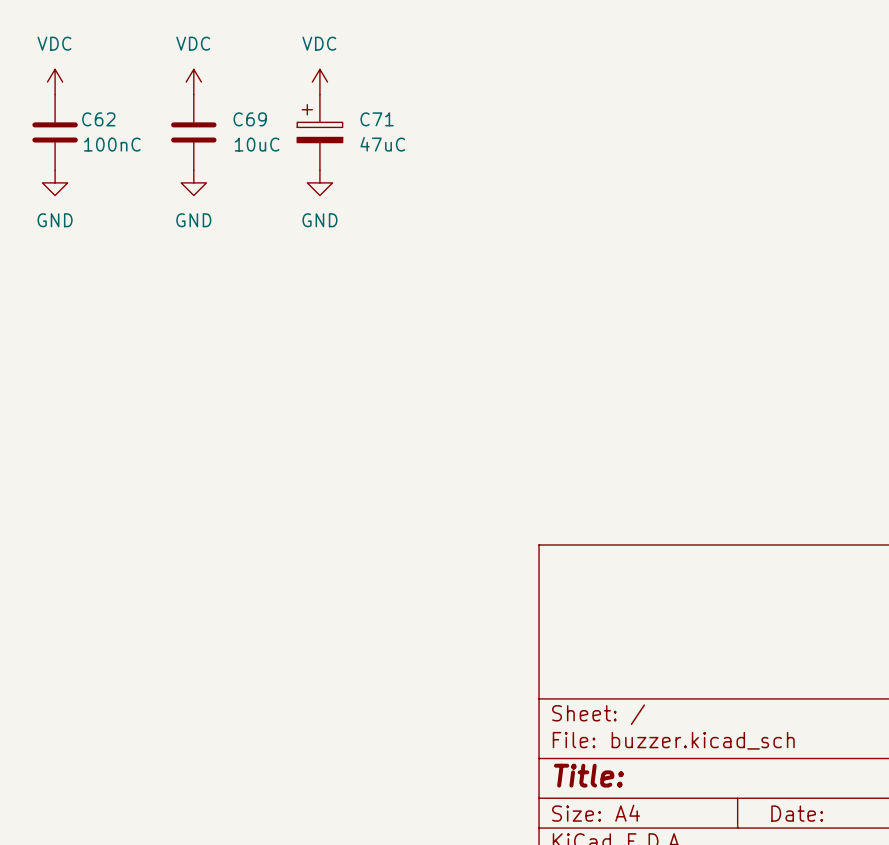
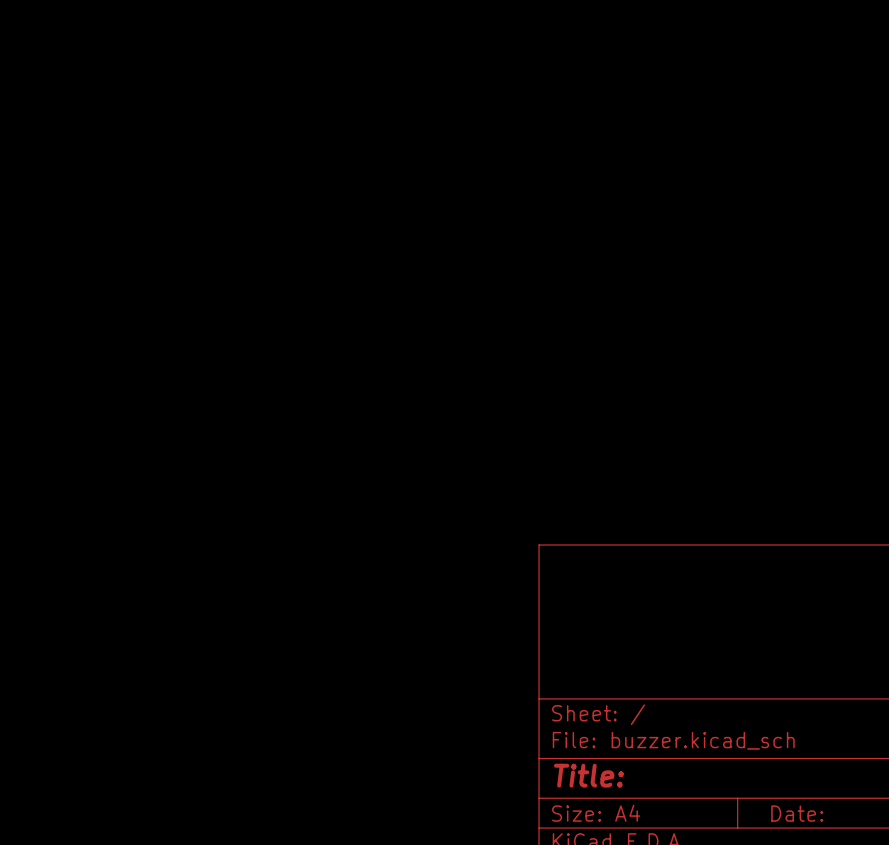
power symbol: VDC (55, 82) -> none
power symbol: VDC (193, 82) -> none
power symbol: VDC (319, 82) -> none
C62: 100nC (55, 132) -> none
C69: 10uC (193, 132) -> none
C71: 47uC (319, 132) -> none
power symbol: GND (55, 182) -> none
power symbol: GND (193, 182) -> none
power symbol: GND (319, 182) -> none

